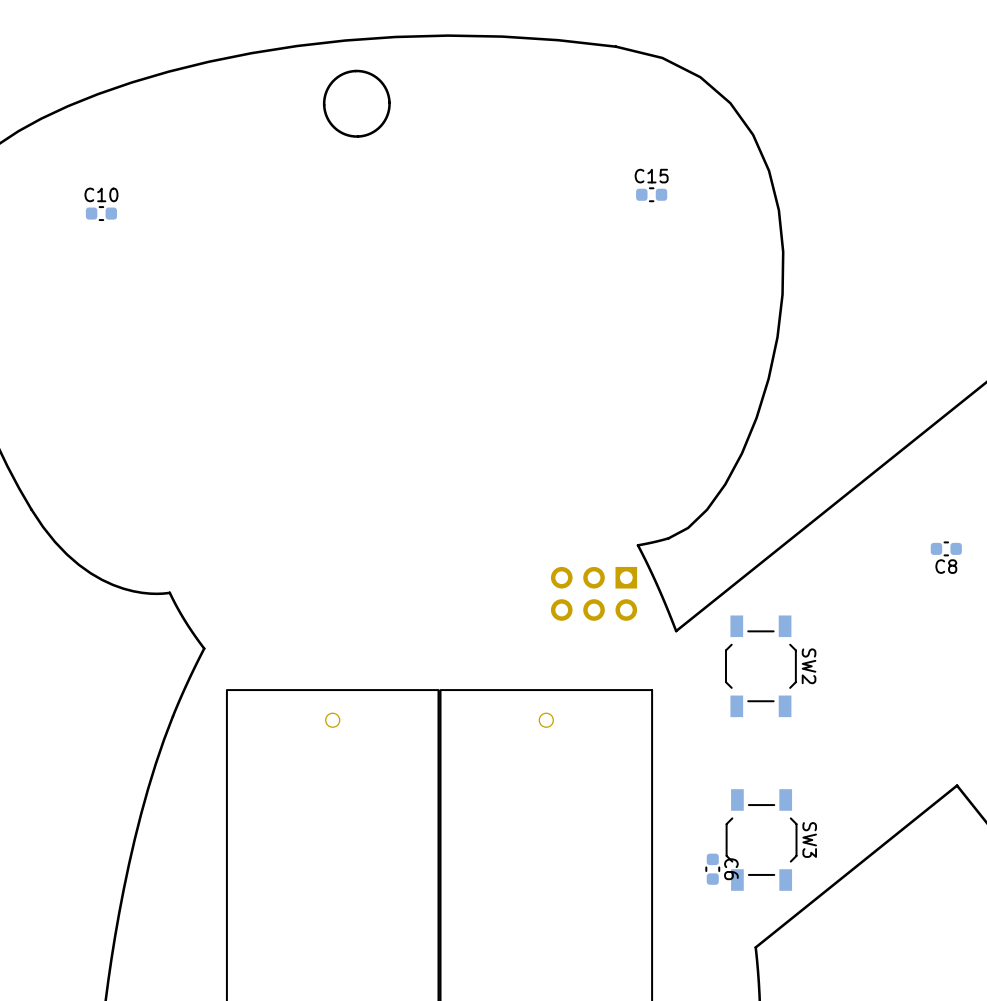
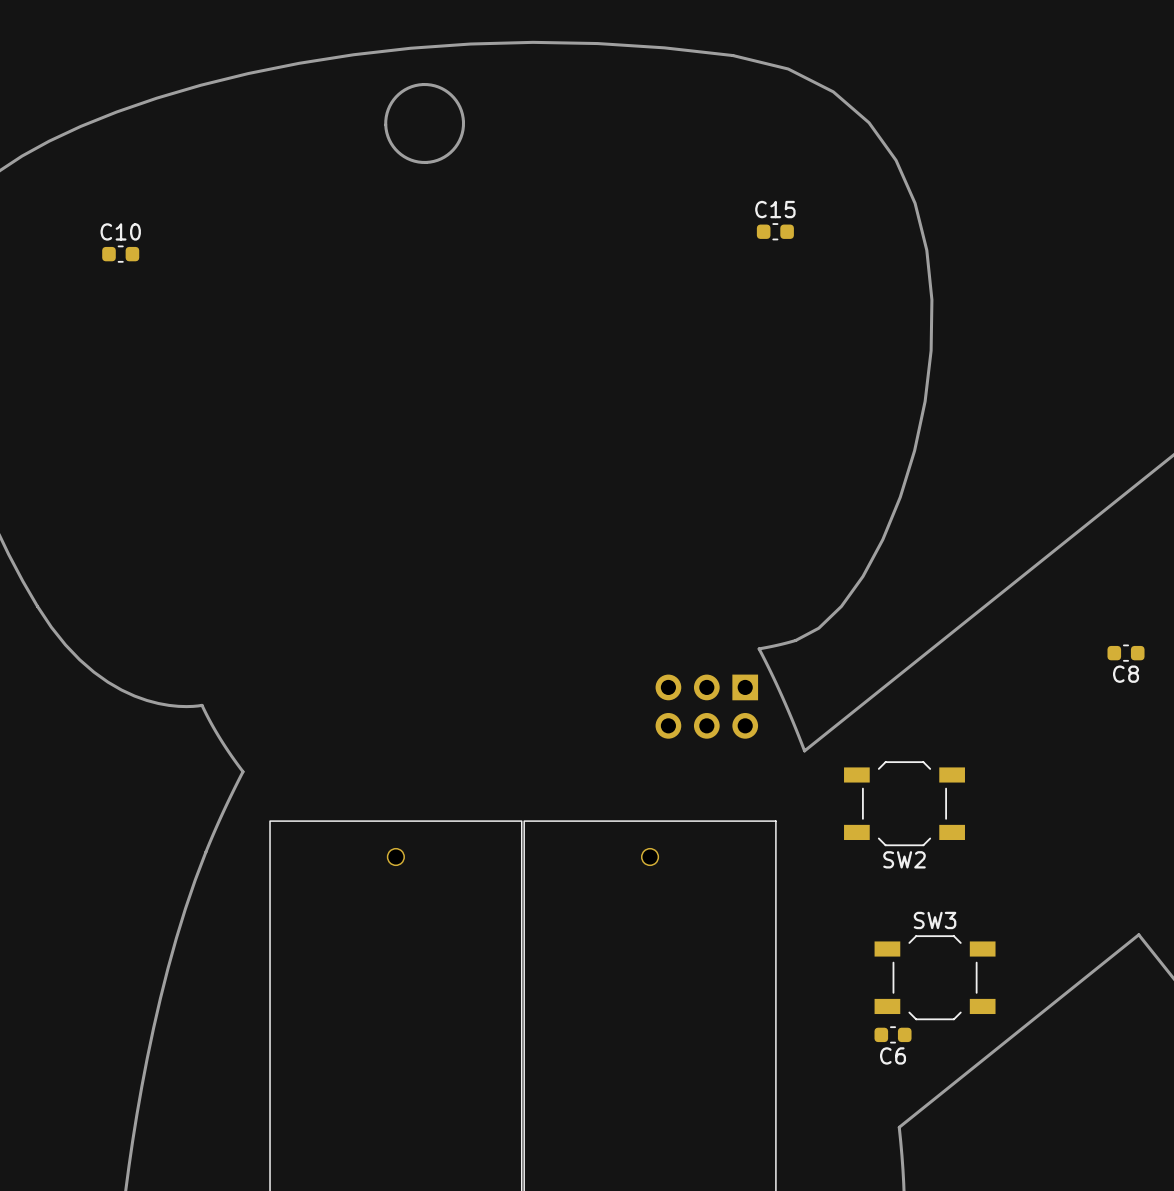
SW2 rotation: 0° (760, 666) -> 90° clockwise (904, 803)
SW3 rotation: 0° (761, 840) -> 90° clockwise (935, 977)
SW3 name position: SW3 (809, 840) -> SW3 (935, 920)
C6 rotation: 0° (712, 869) -> 90° clockwise (893, 1034)
C6 position: (712, 869) -> (893, 1034)

